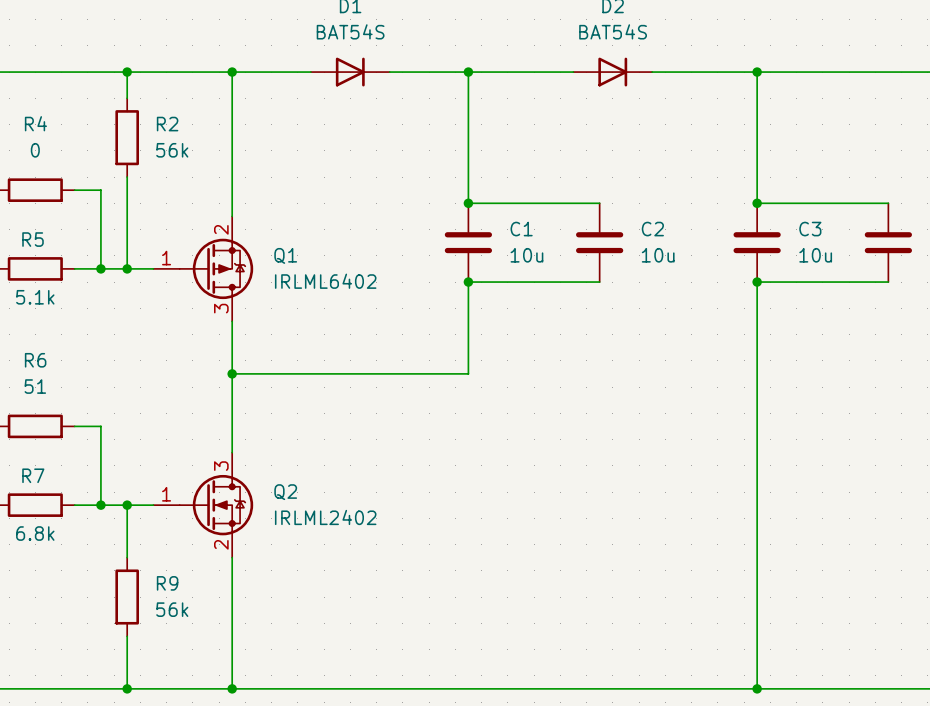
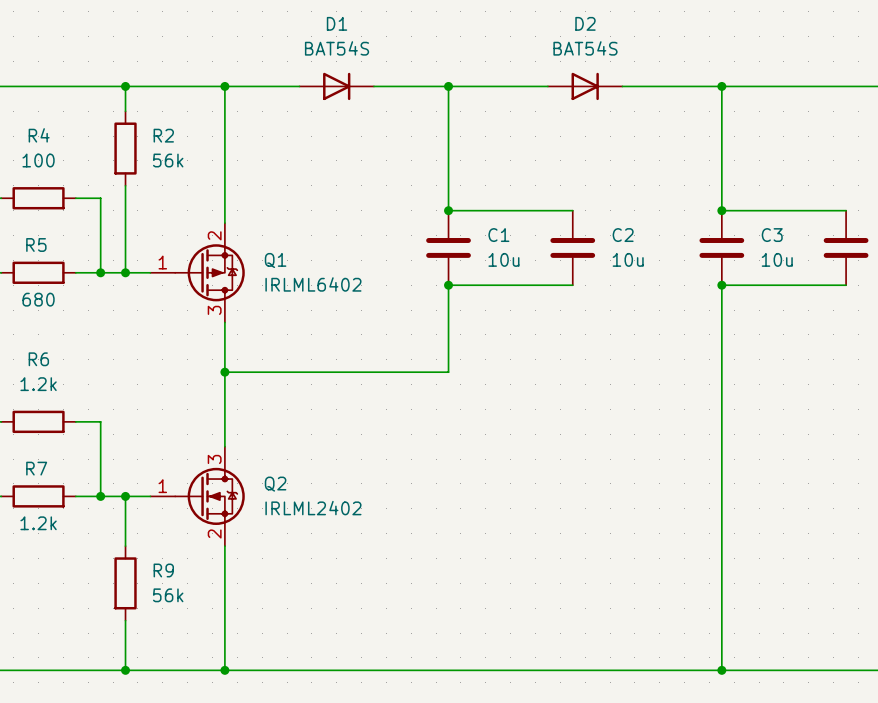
R4 value: 0 (35, 150) -> 100 (38, 160)
R5 value: 5.1k (35, 297) -> 680 (38, 299)
R6 value: 51 (35, 386) -> 1.2k (38, 384)
R7 value: 6.8k (35, 533) -> 1.2k (38, 523)

